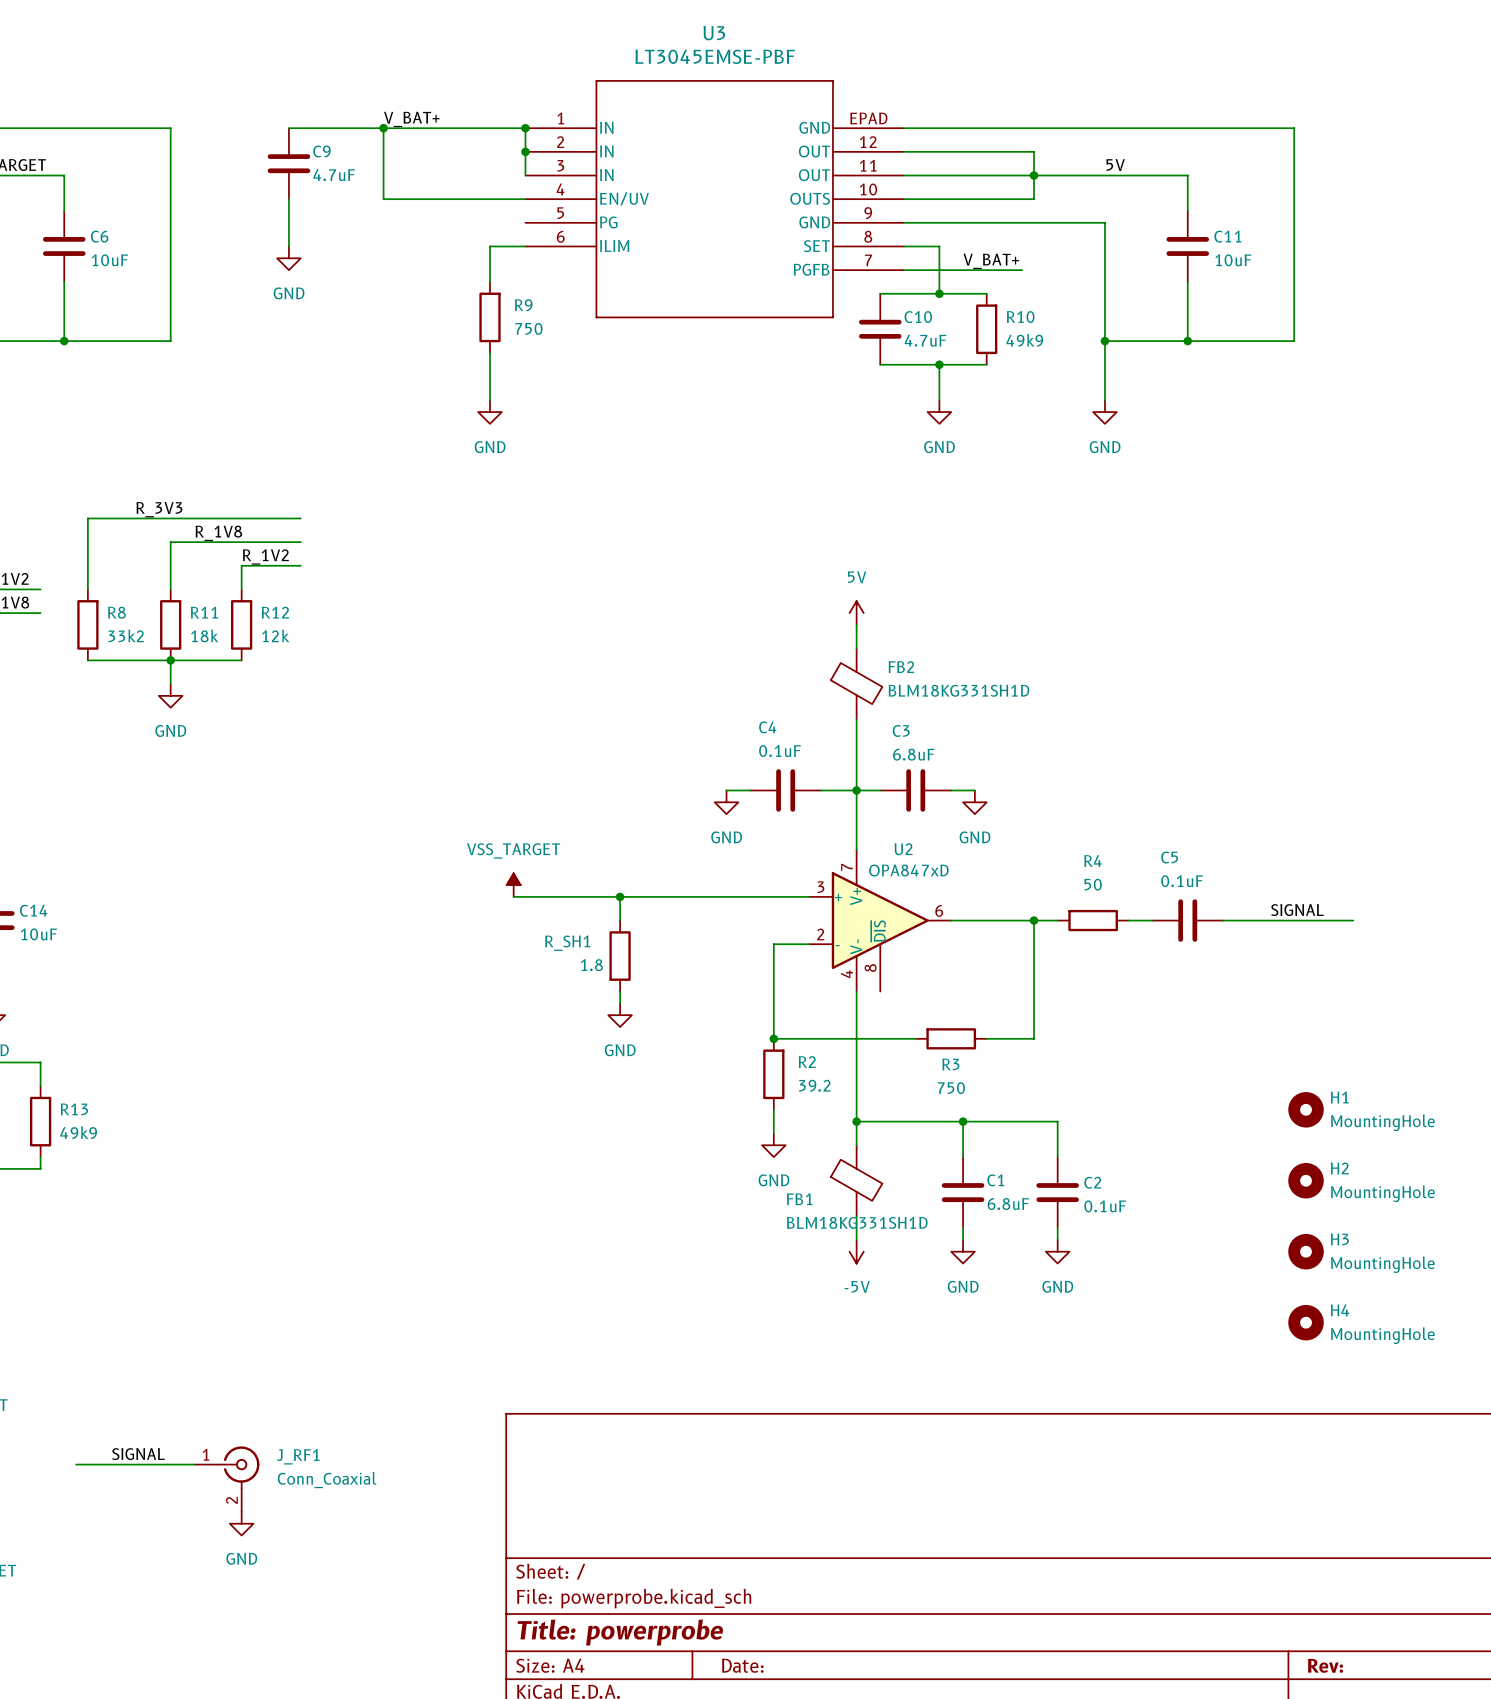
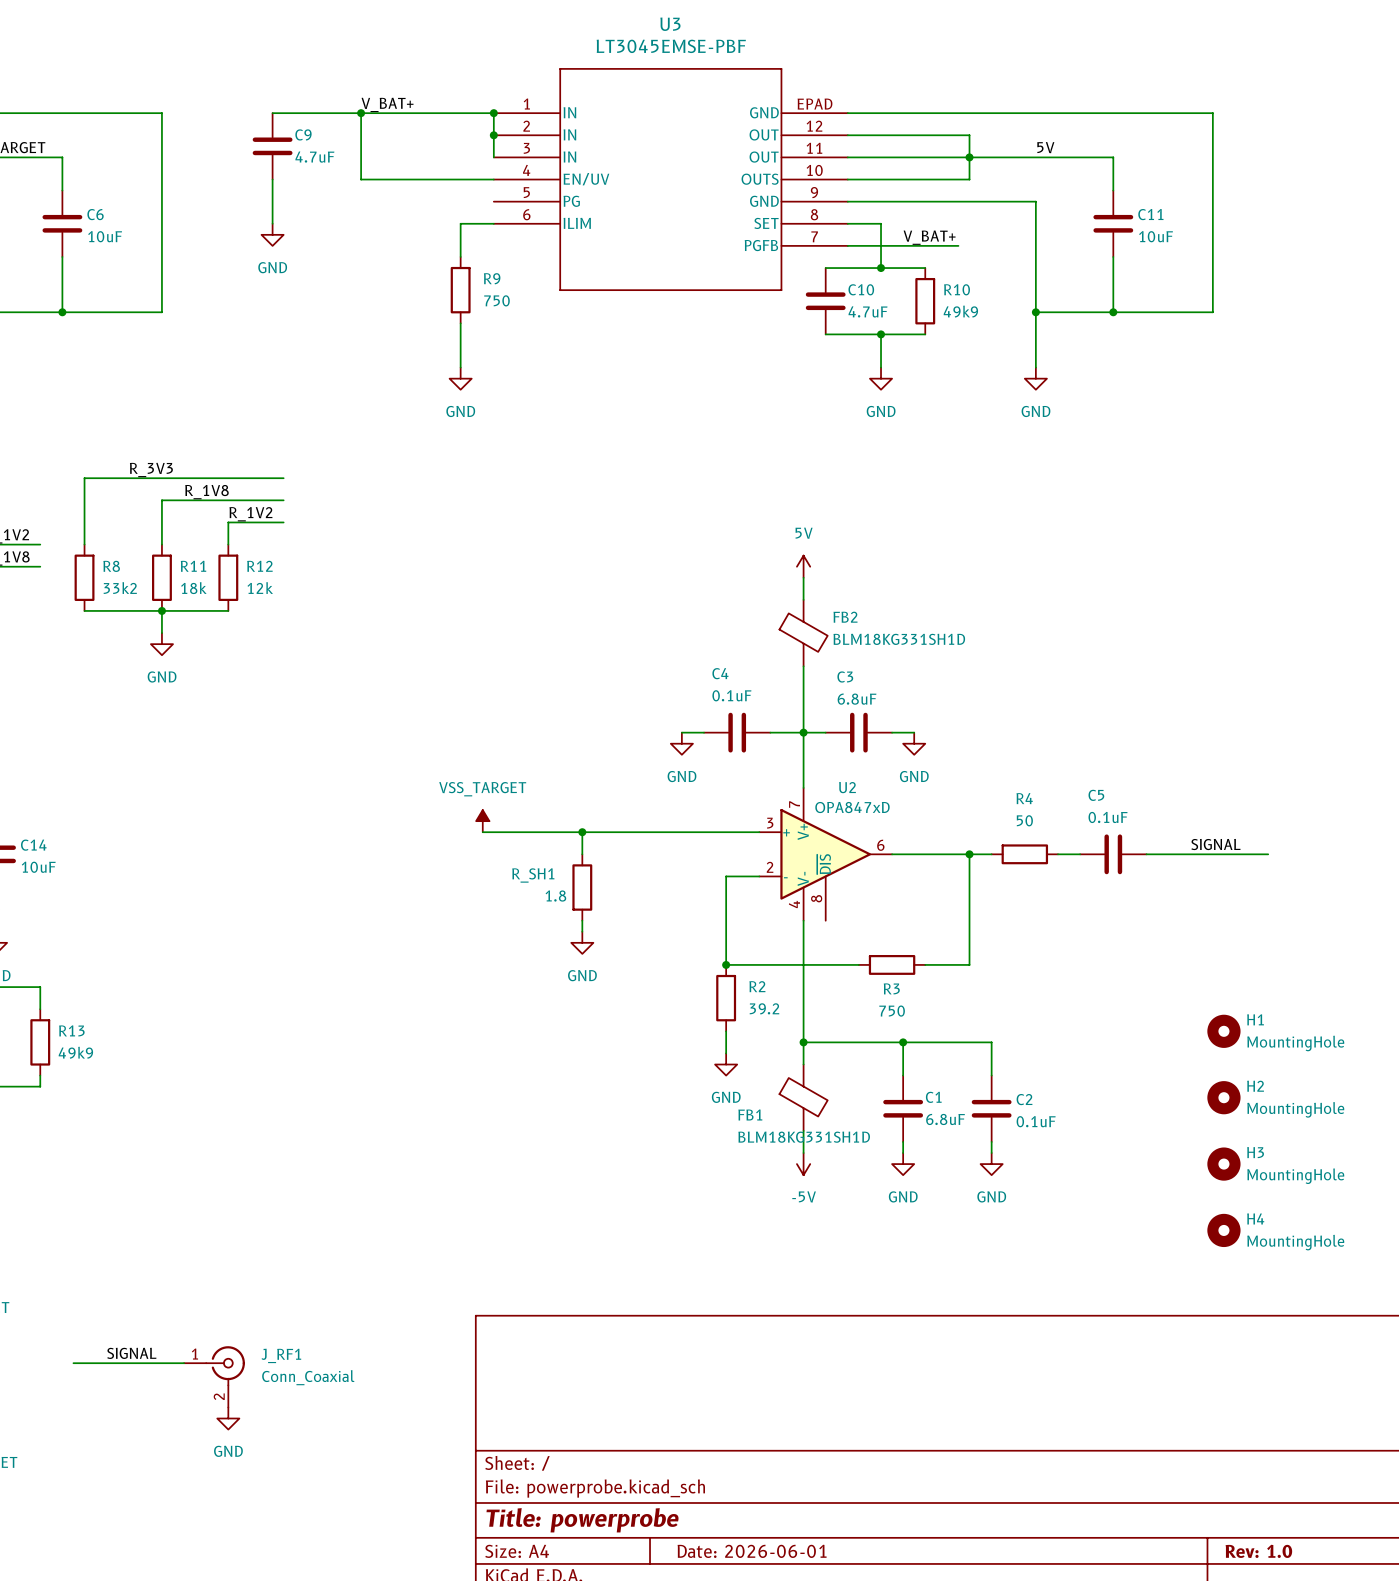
title block: Date: (742, 1665) -> Date: 2026-06-01 (752, 1551)
title block: Rev: (1325, 1665) -> Rev: 1.0 (1258, 1551)

